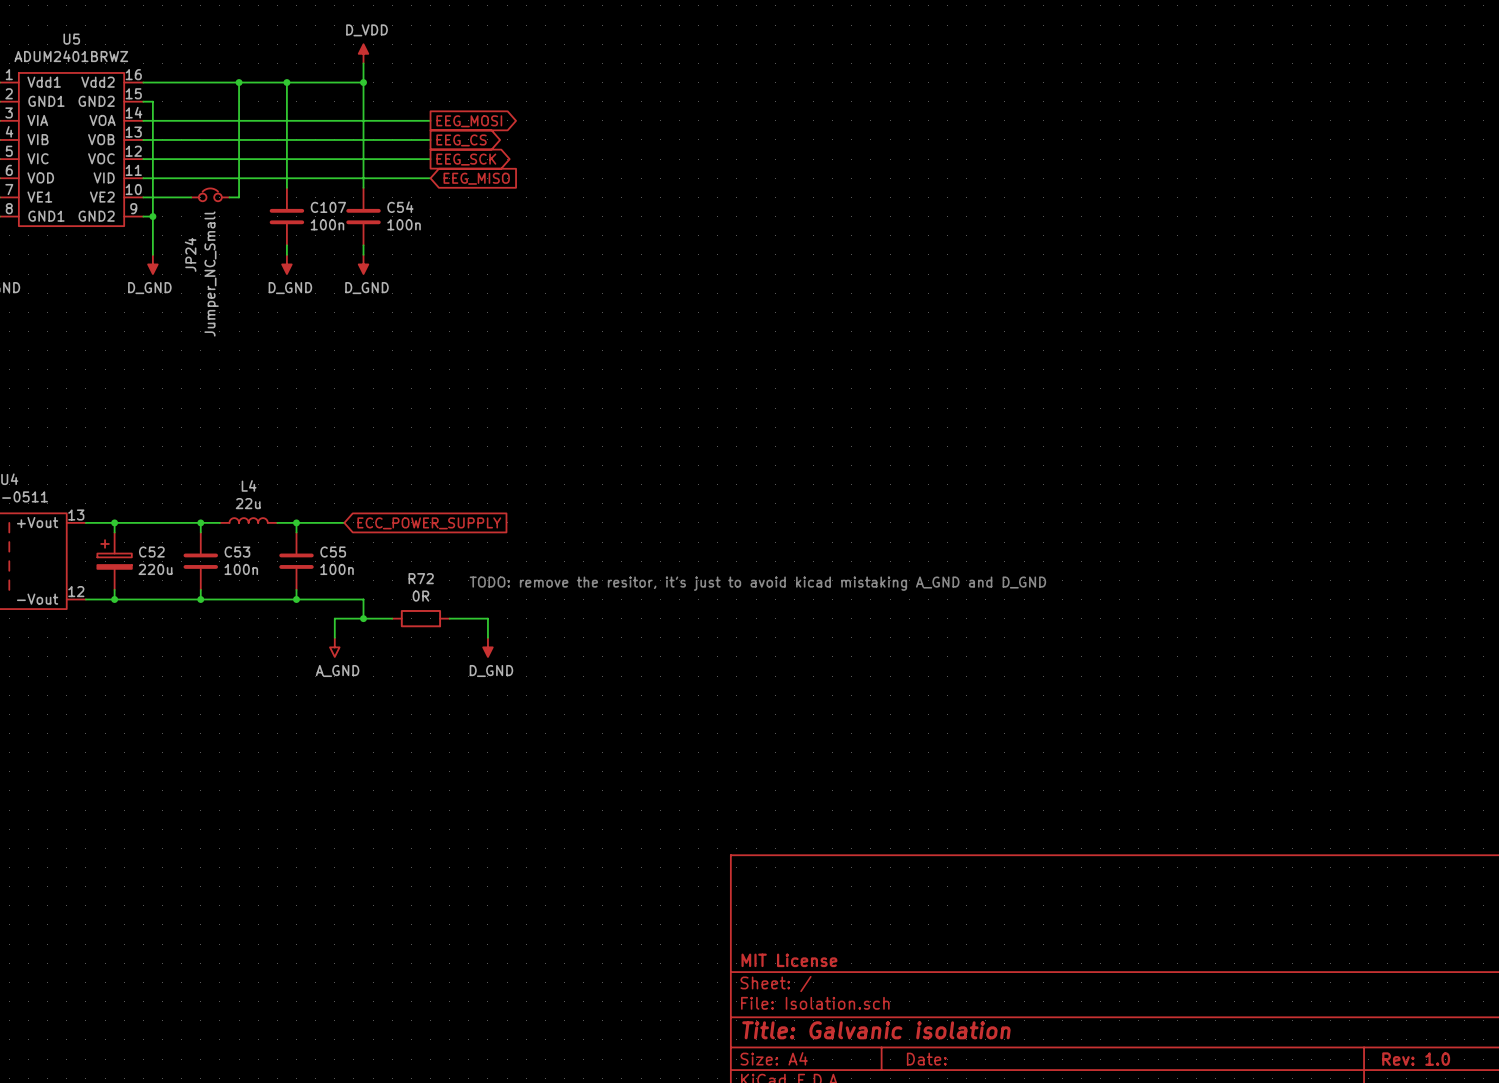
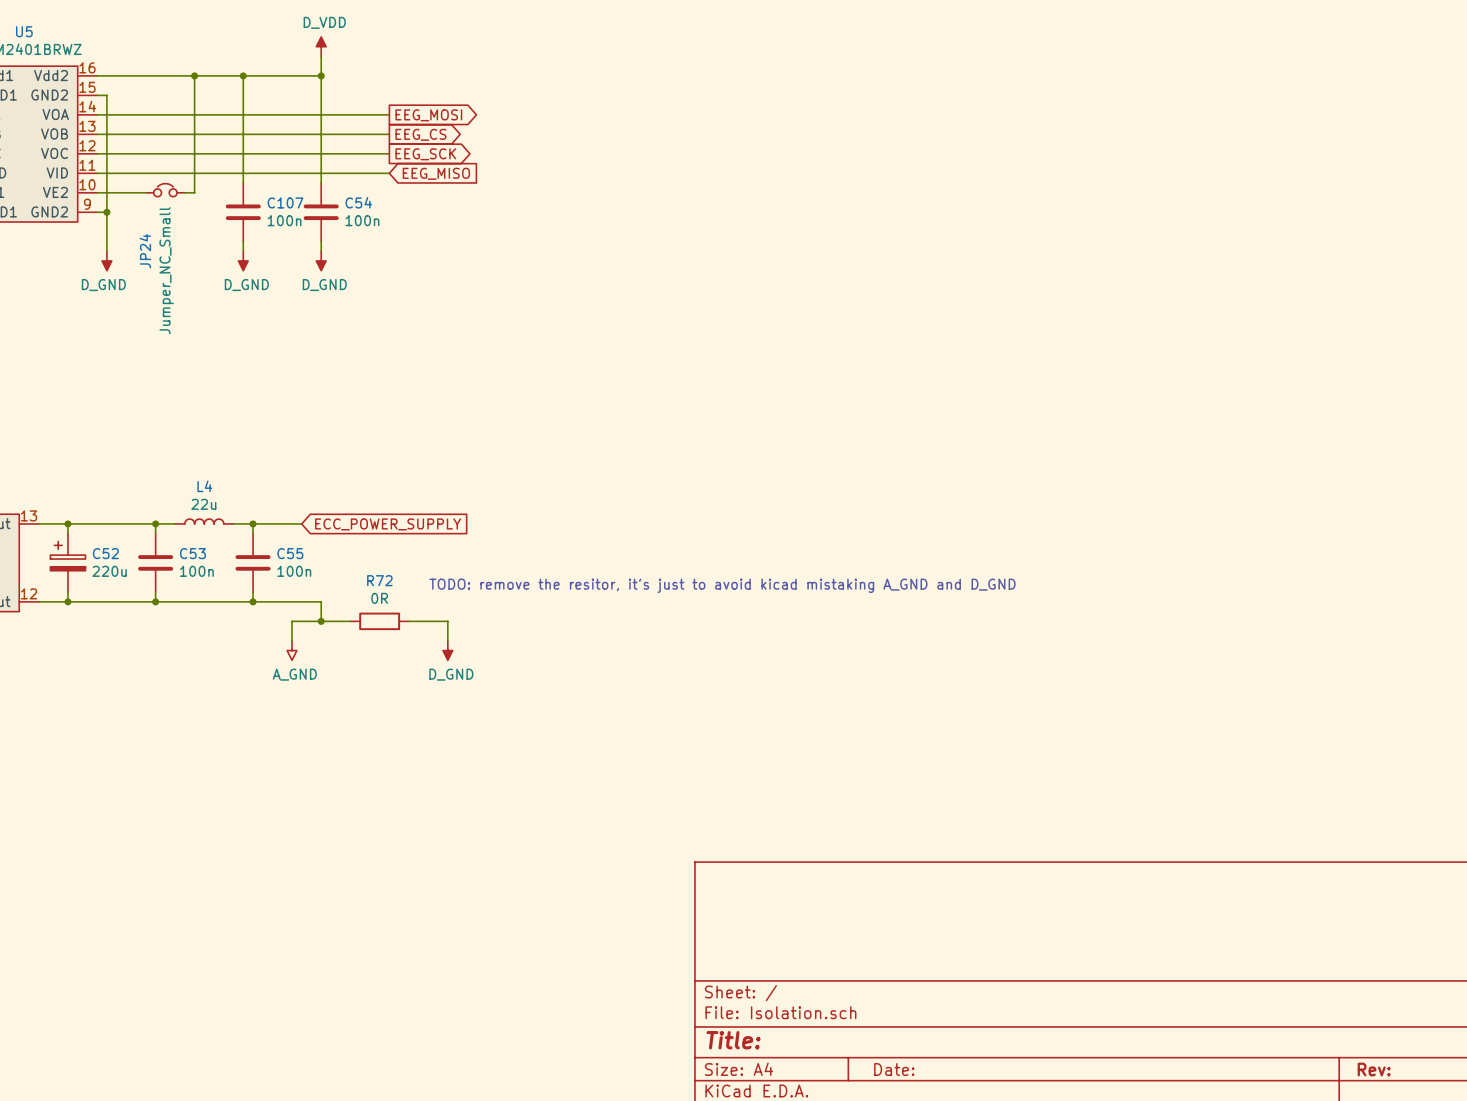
title block: MIT License (789, 960) -> none
title block: Title: Galvanic isolation (876, 1030) -> Title: (733, 1040)
title block: Rev: 1.0 (1416, 1059) -> Rev: (1374, 1069)

